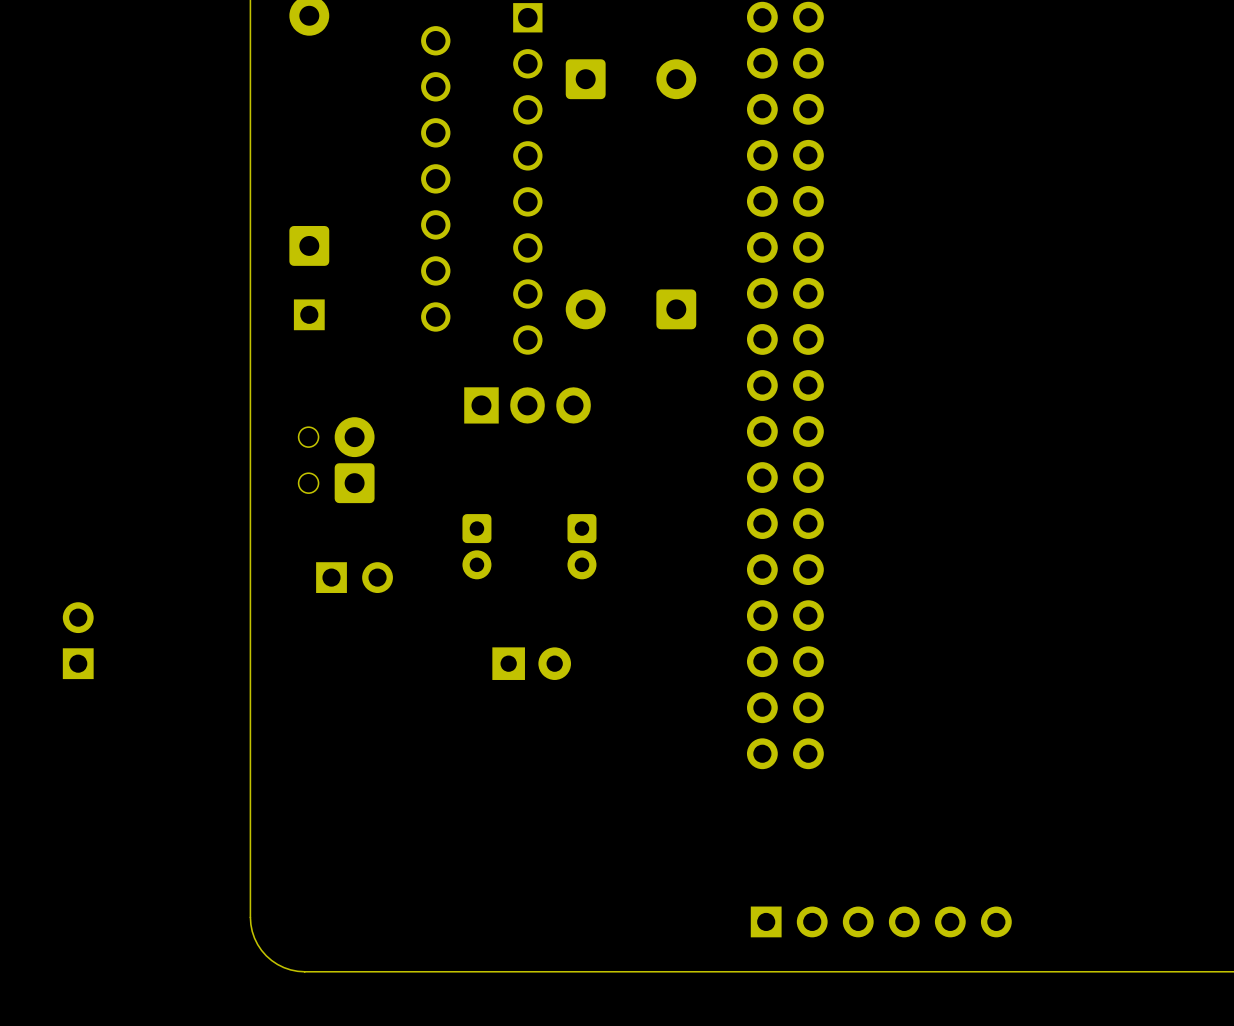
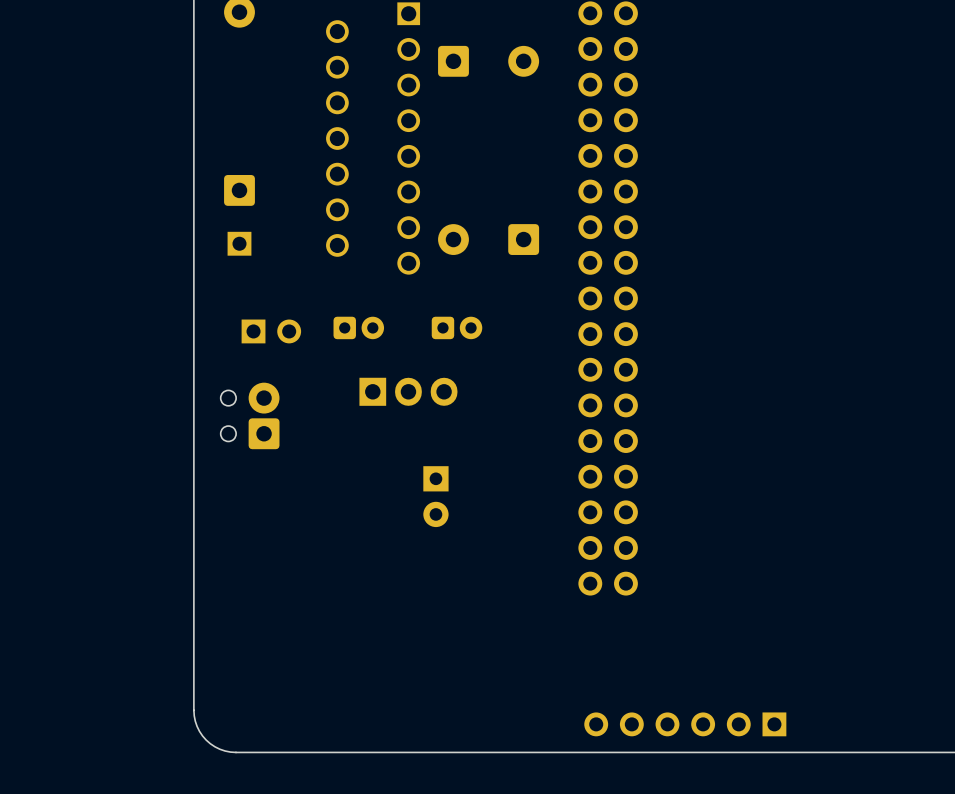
part position: (527, 405) -> (408, 391)
part: none -> (358, 327)
part: none -> (457, 327)
part position: (336, 460) -> (250, 415)
part: (476, 546) -> none
part: (581, 546) -> none
part position: (354, 577) -> (271, 331)
part: (78, 640) -> none
part rotation: 0° (531, 663) -> 90° clockwise (435, 496)
part rotation: 0° (881, 921) -> 180° (685, 724)

